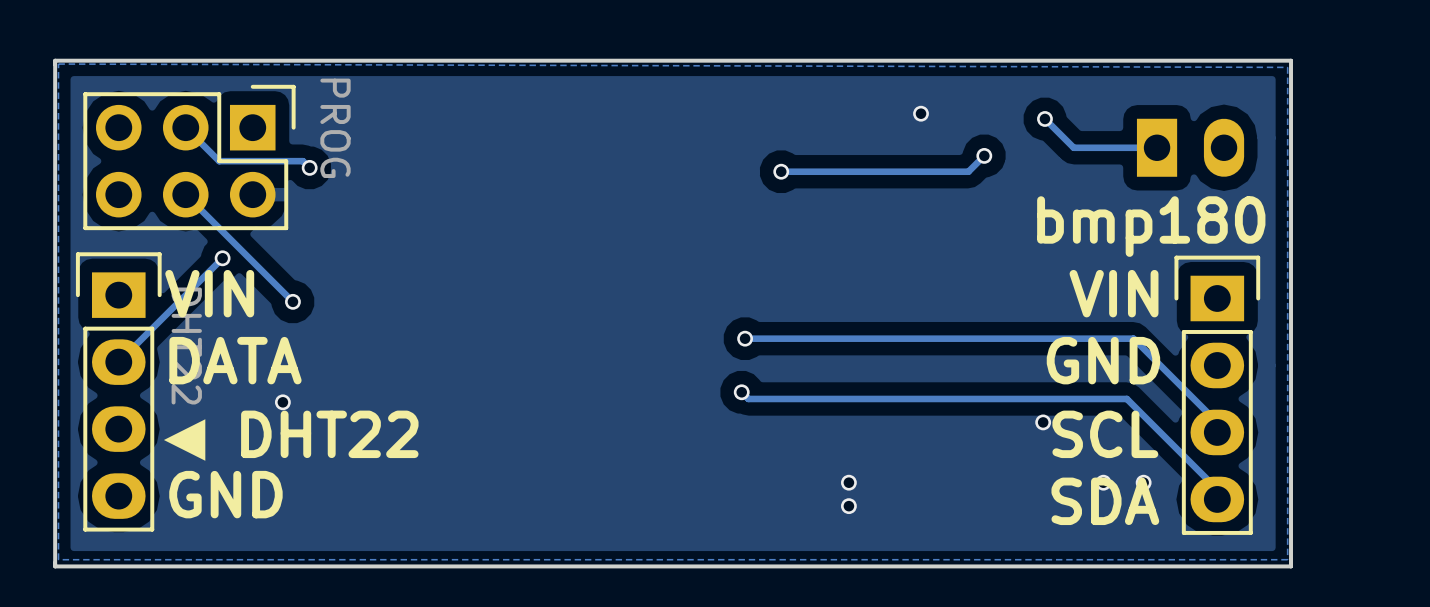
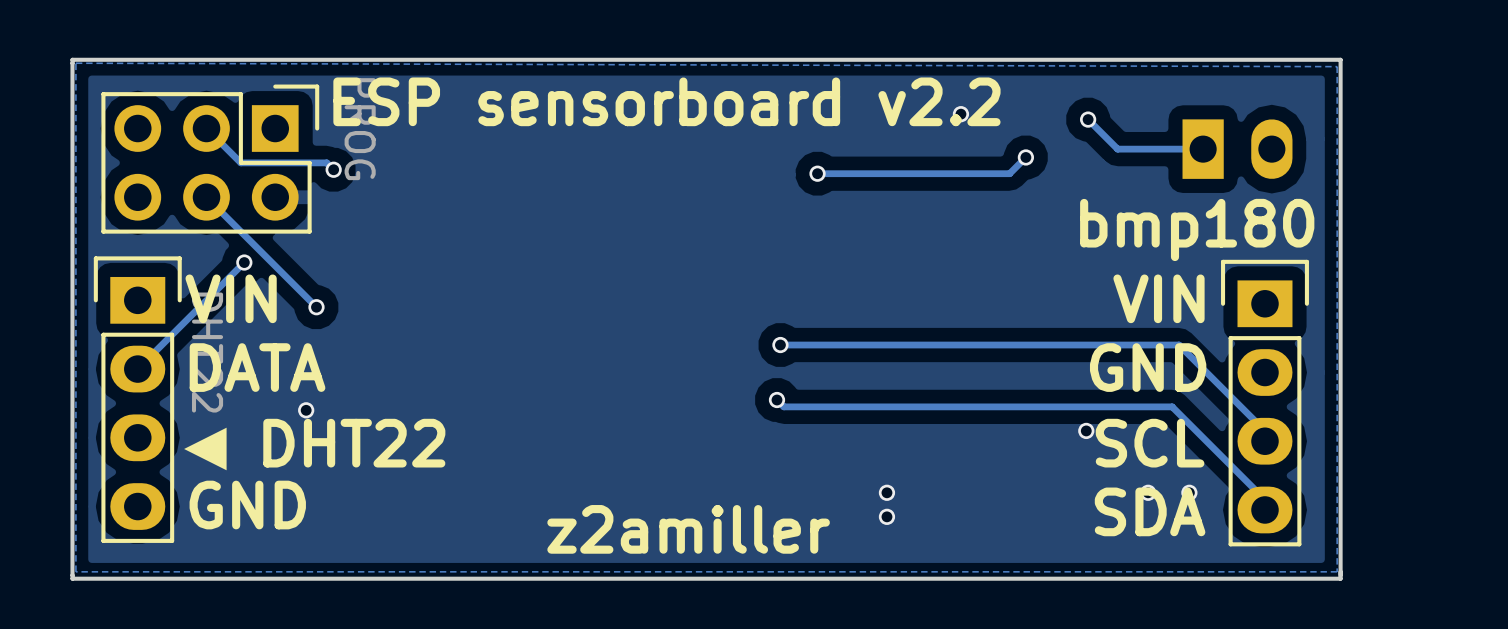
text: none -> ESP sensorboard v2.2 (666, 101)
text: none -> z2amiller (688, 529)

